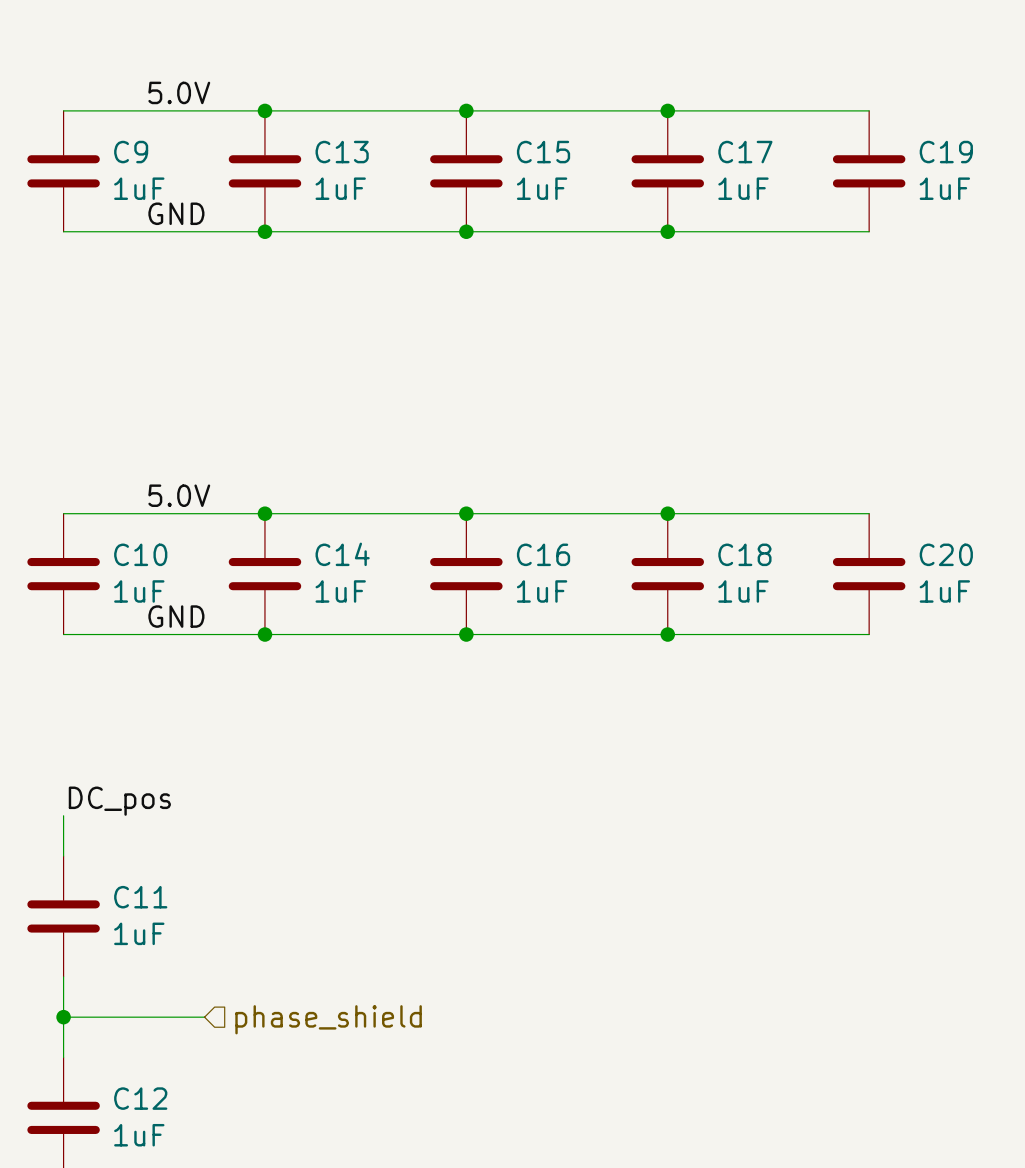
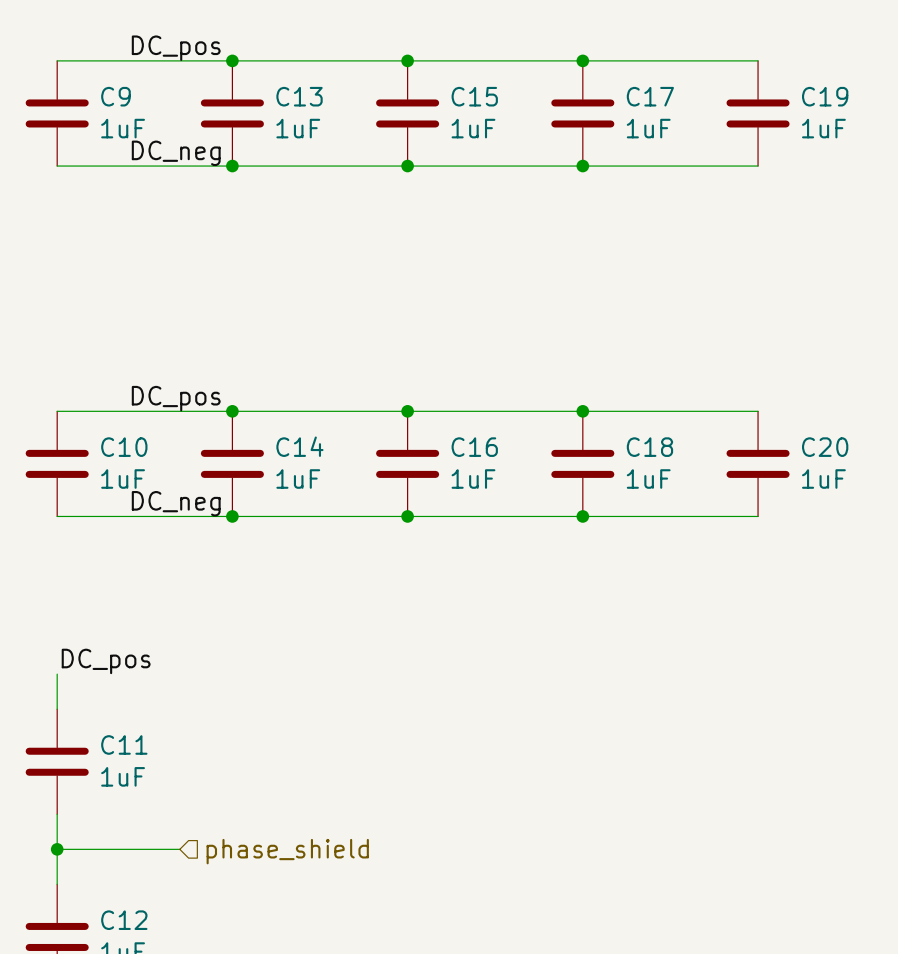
label: 5.0V (179, 92) -> DC_pos (176, 48)
label: GND (176, 213) -> DC_neg (176, 153)
label: 5.0V (179, 495) -> DC_pos (176, 398)
label: GND (176, 616) -> DC_neg (176, 503)

